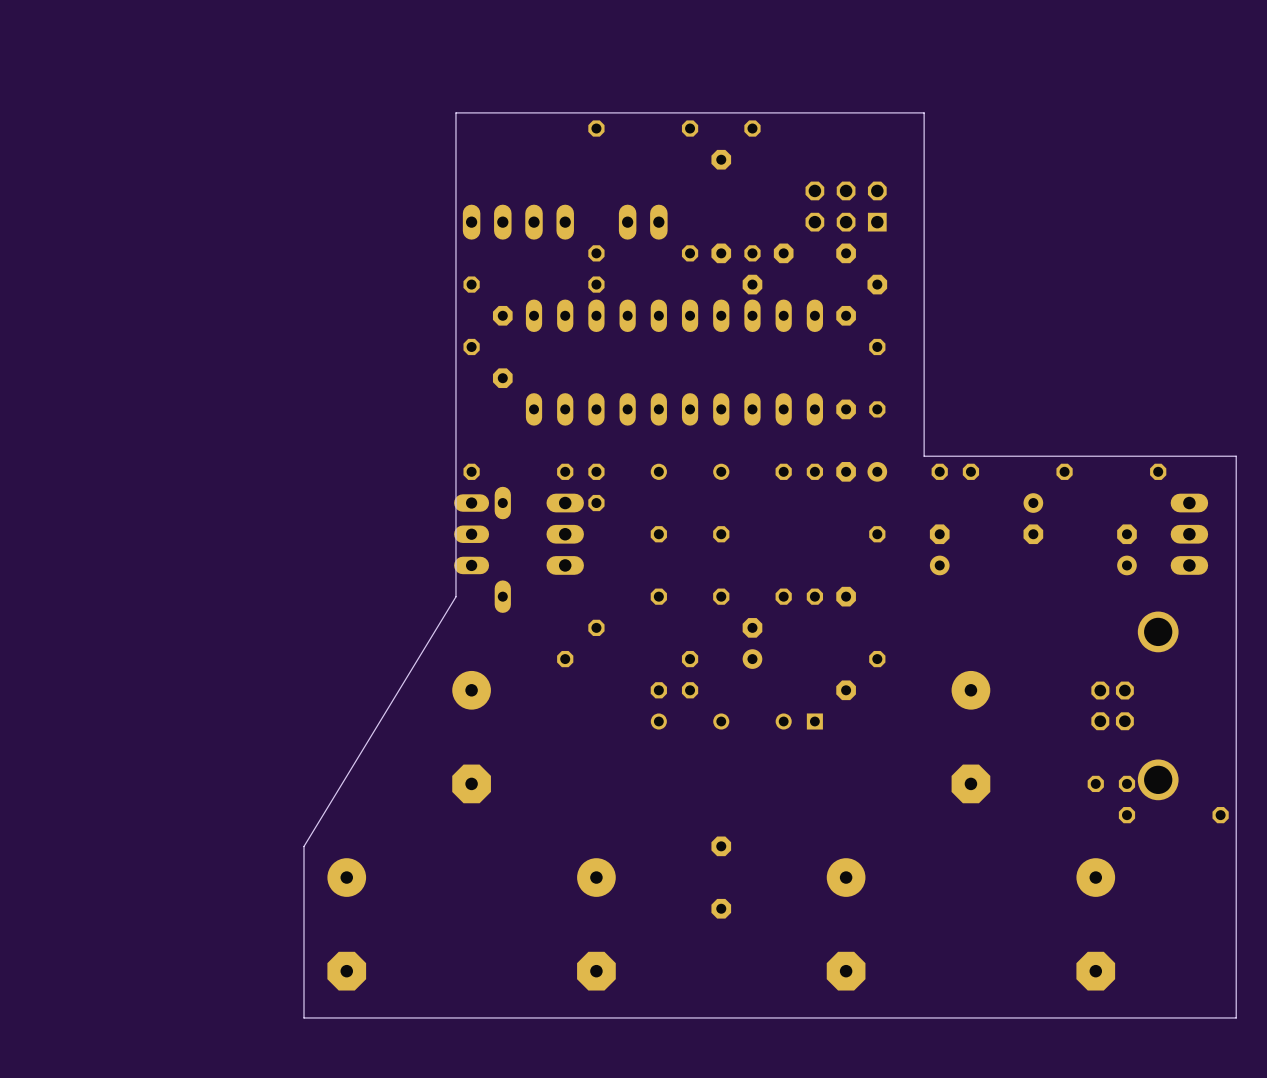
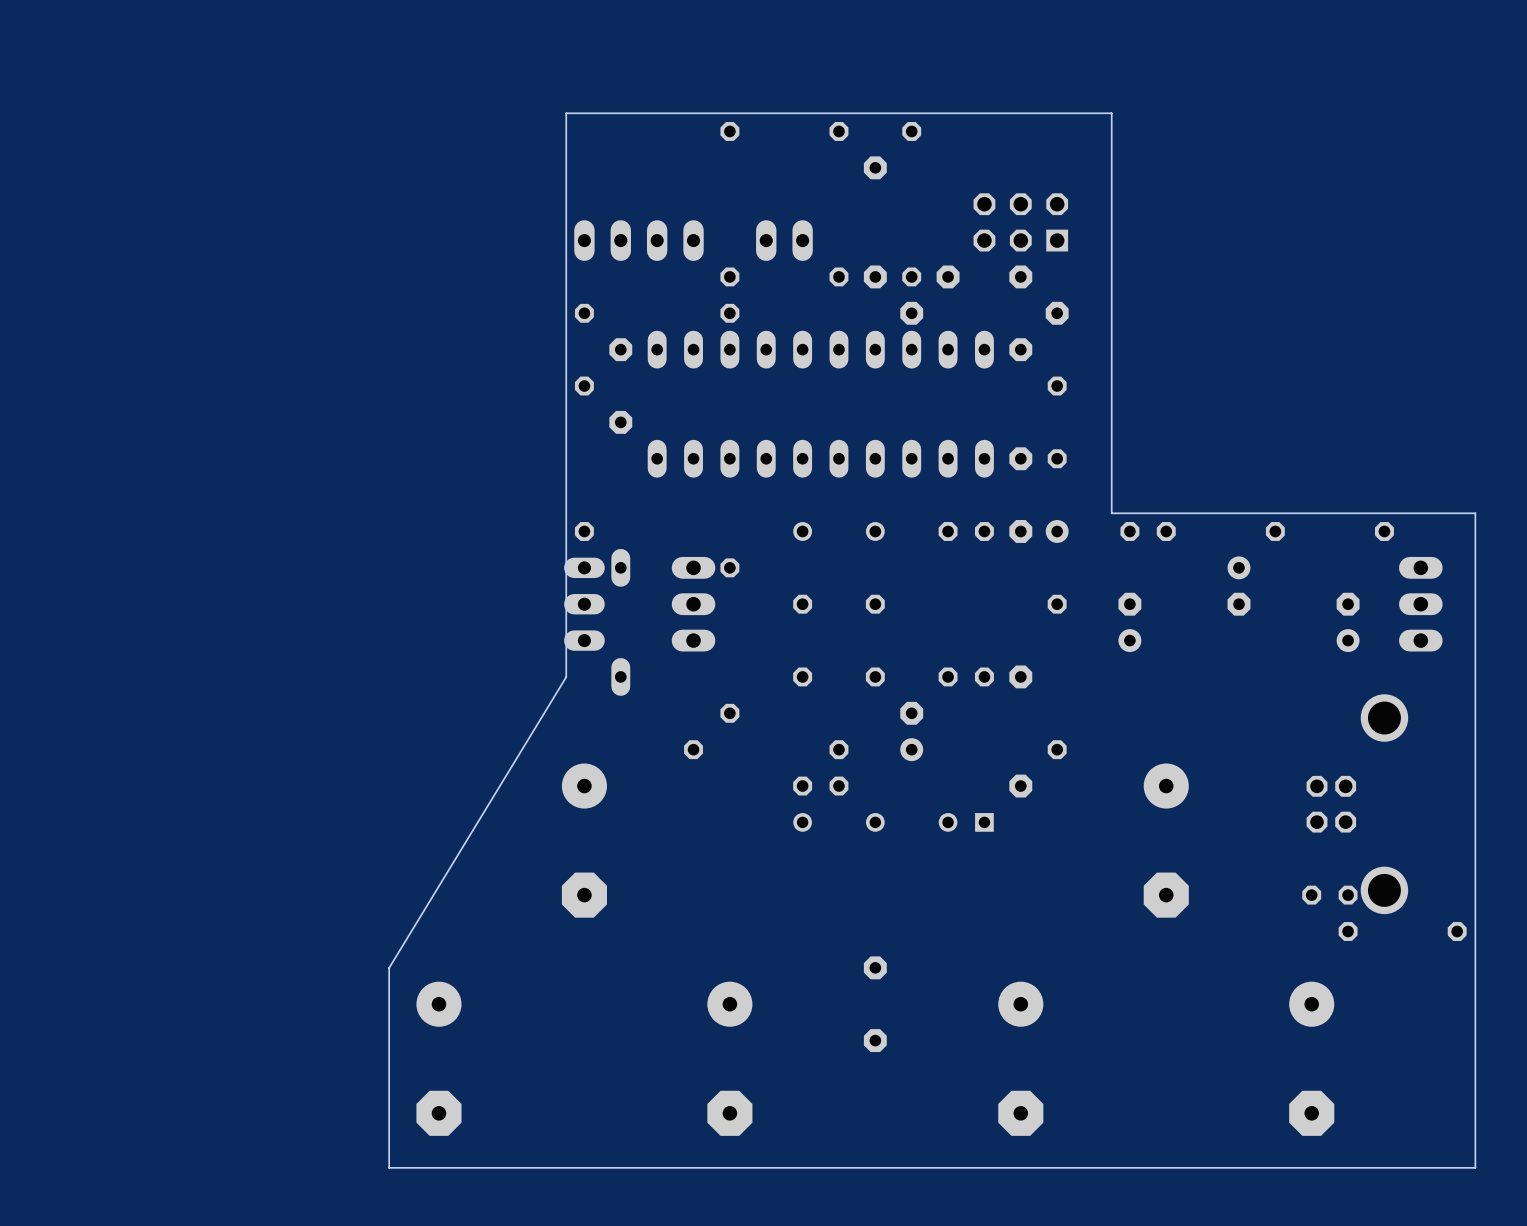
part: (580, 471) -> none

